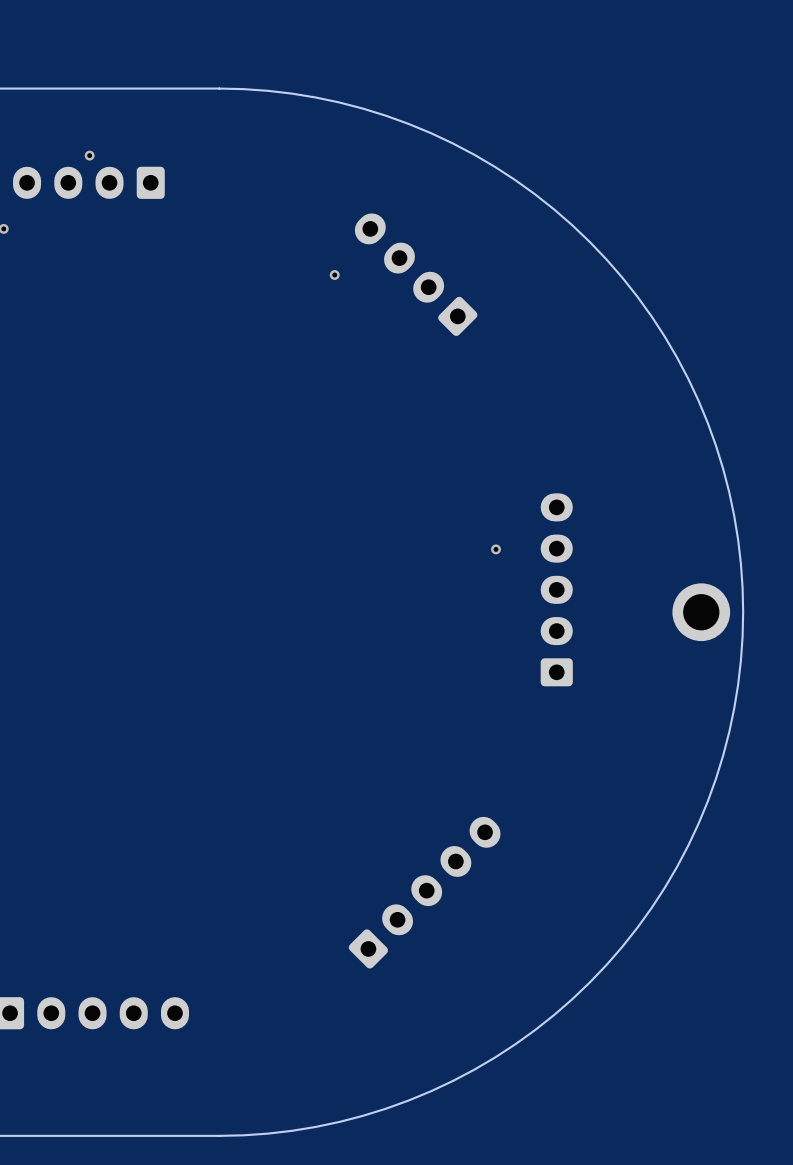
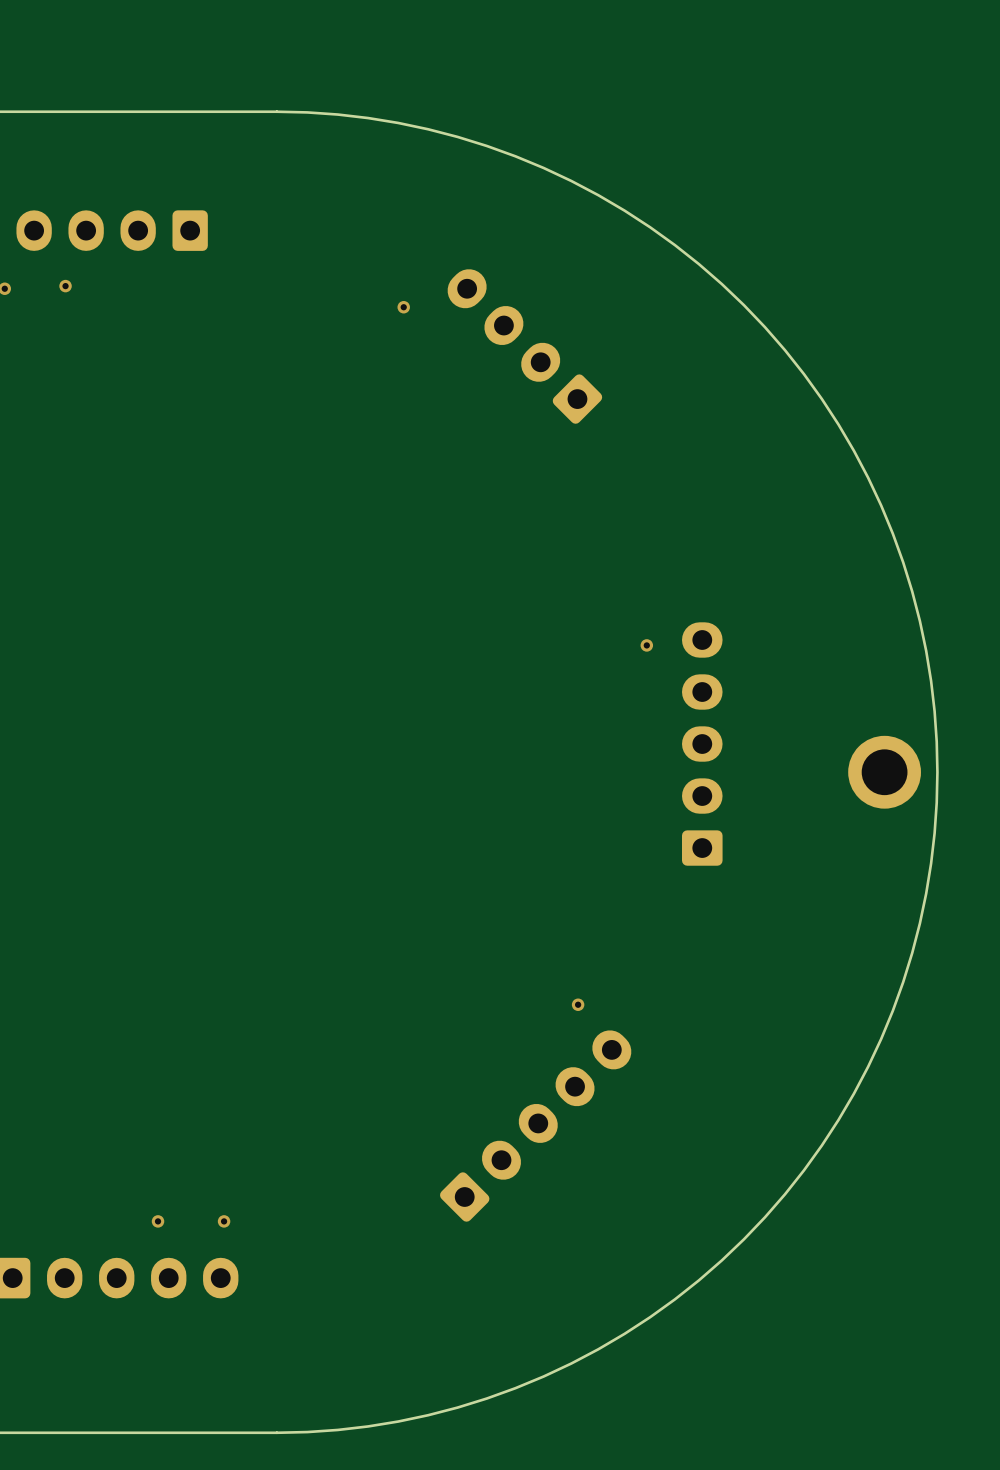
via position: (89, 155) -> (65, 286)
via position: (334, 274) -> (403, 307)
via position: (496, 549) -> (646, 645)
via: none -> (578, 1004)
via: none -> (158, 1221)
via: none -> (224, 1221)

